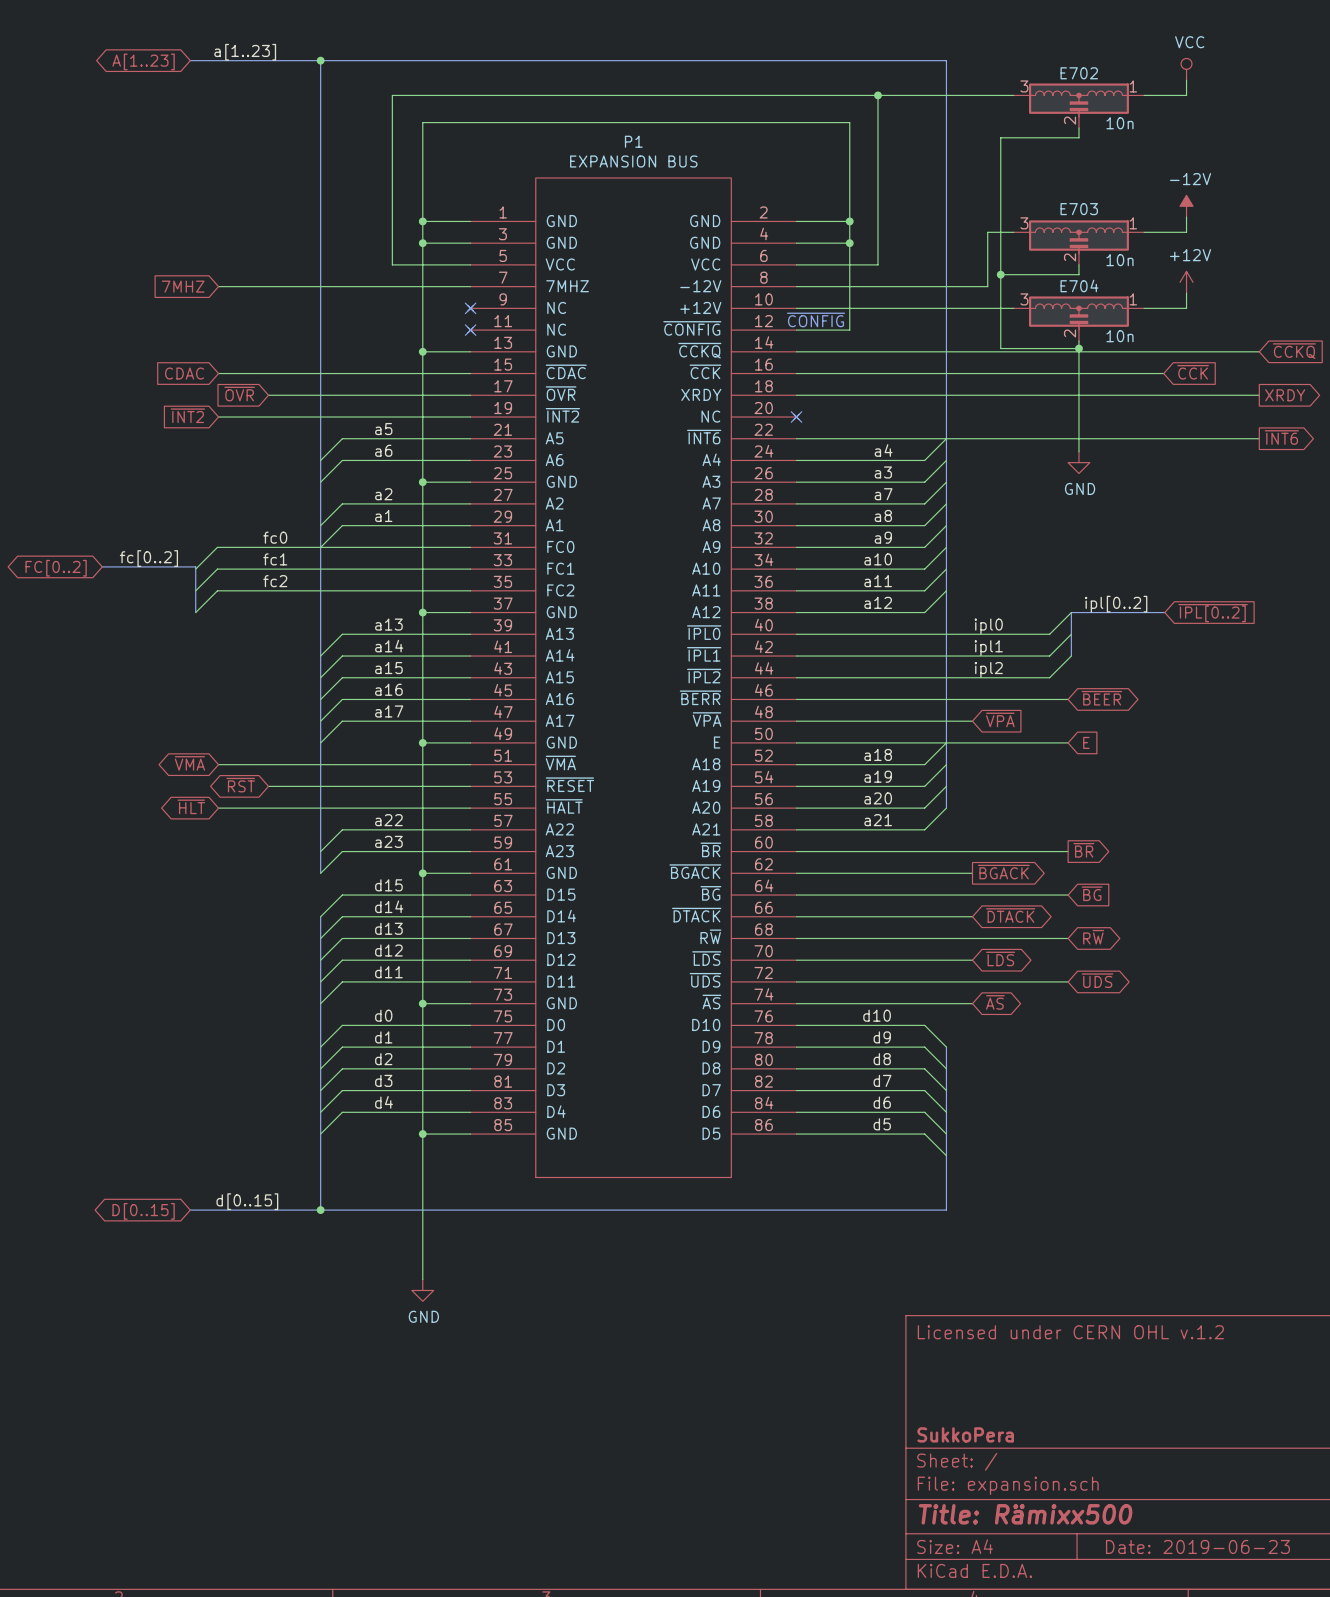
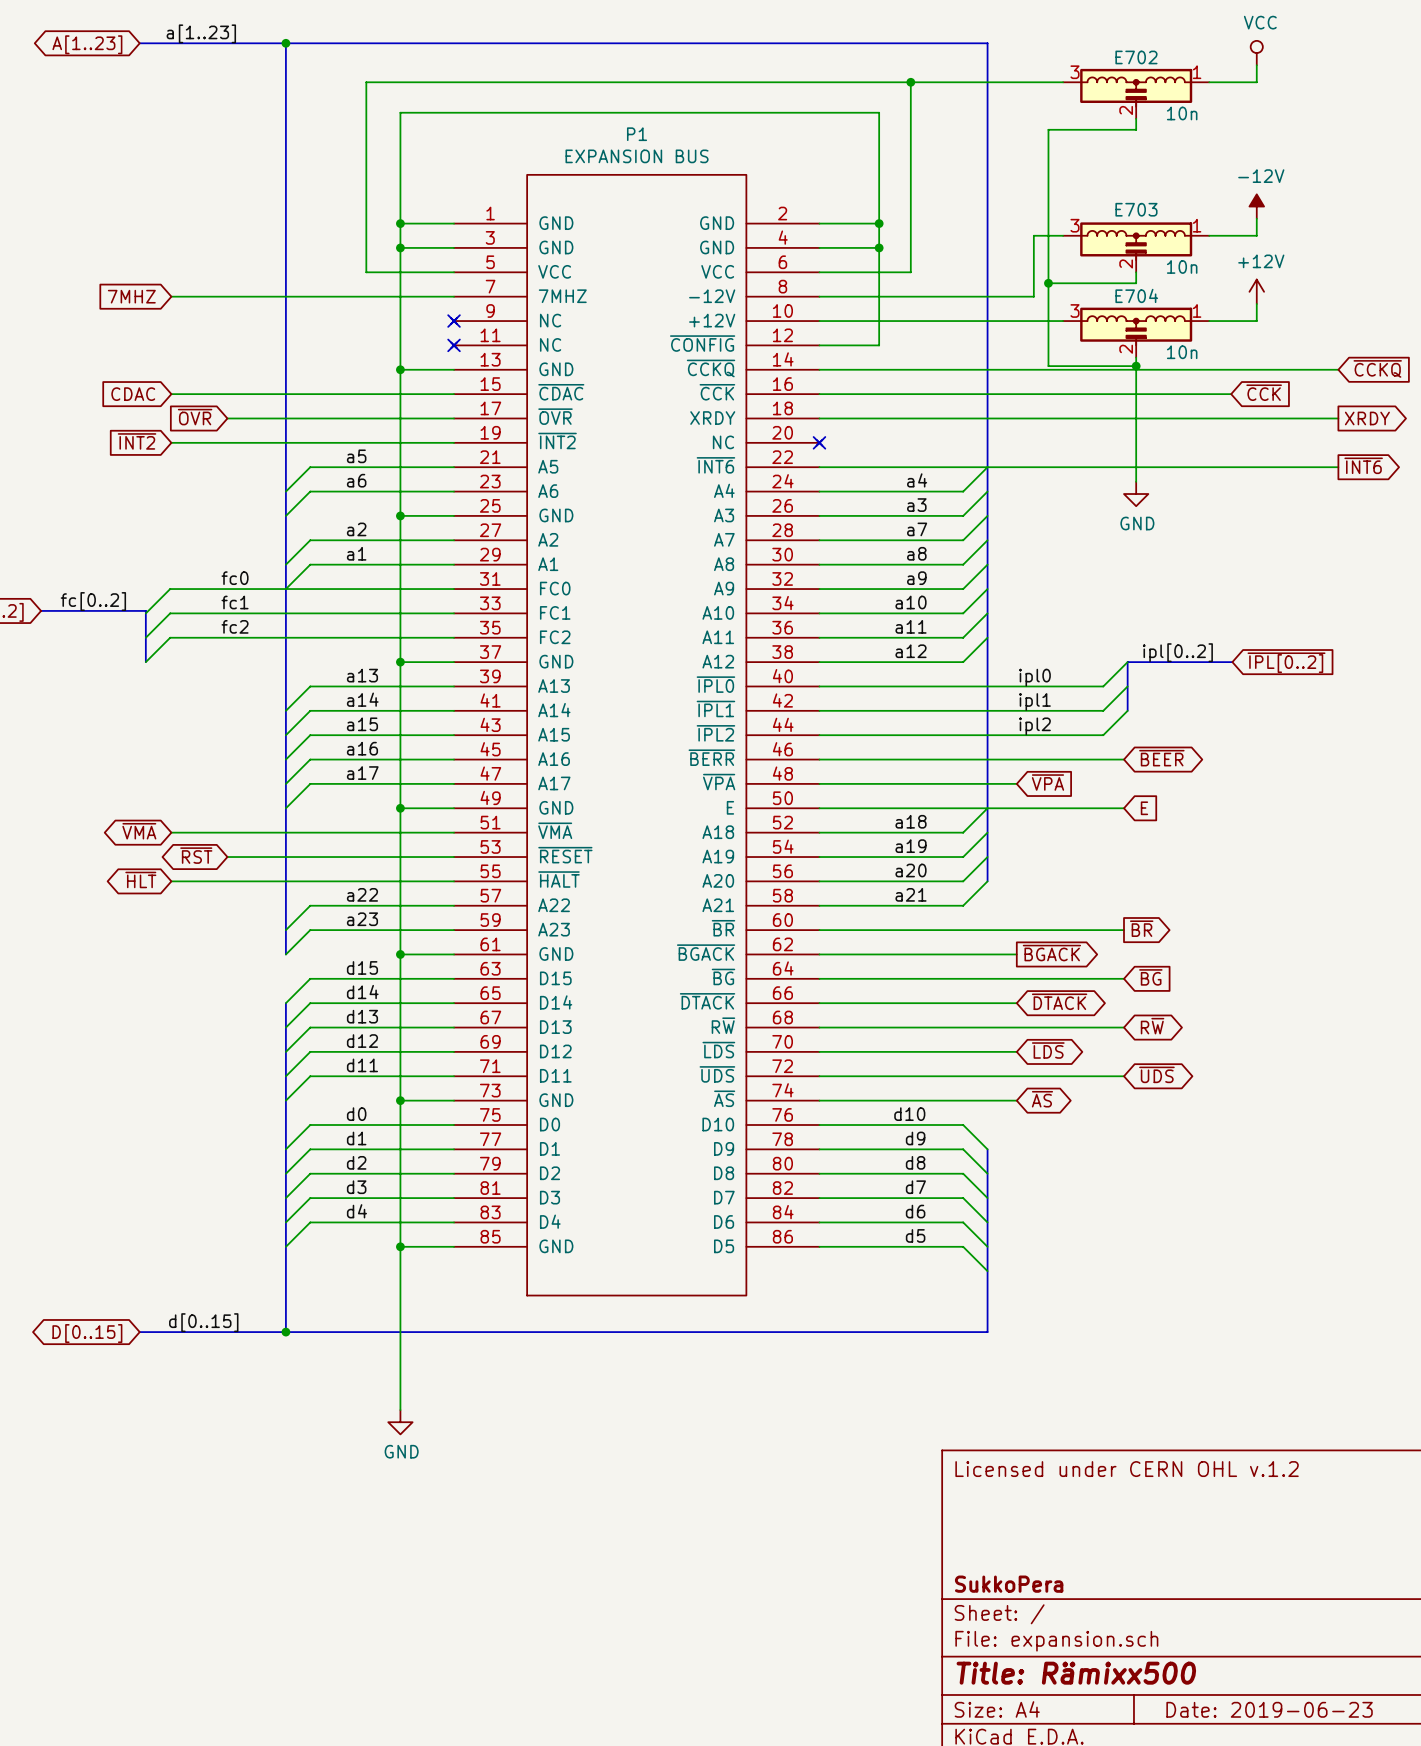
text: ~{CONFIG} (815, 319) -> none

